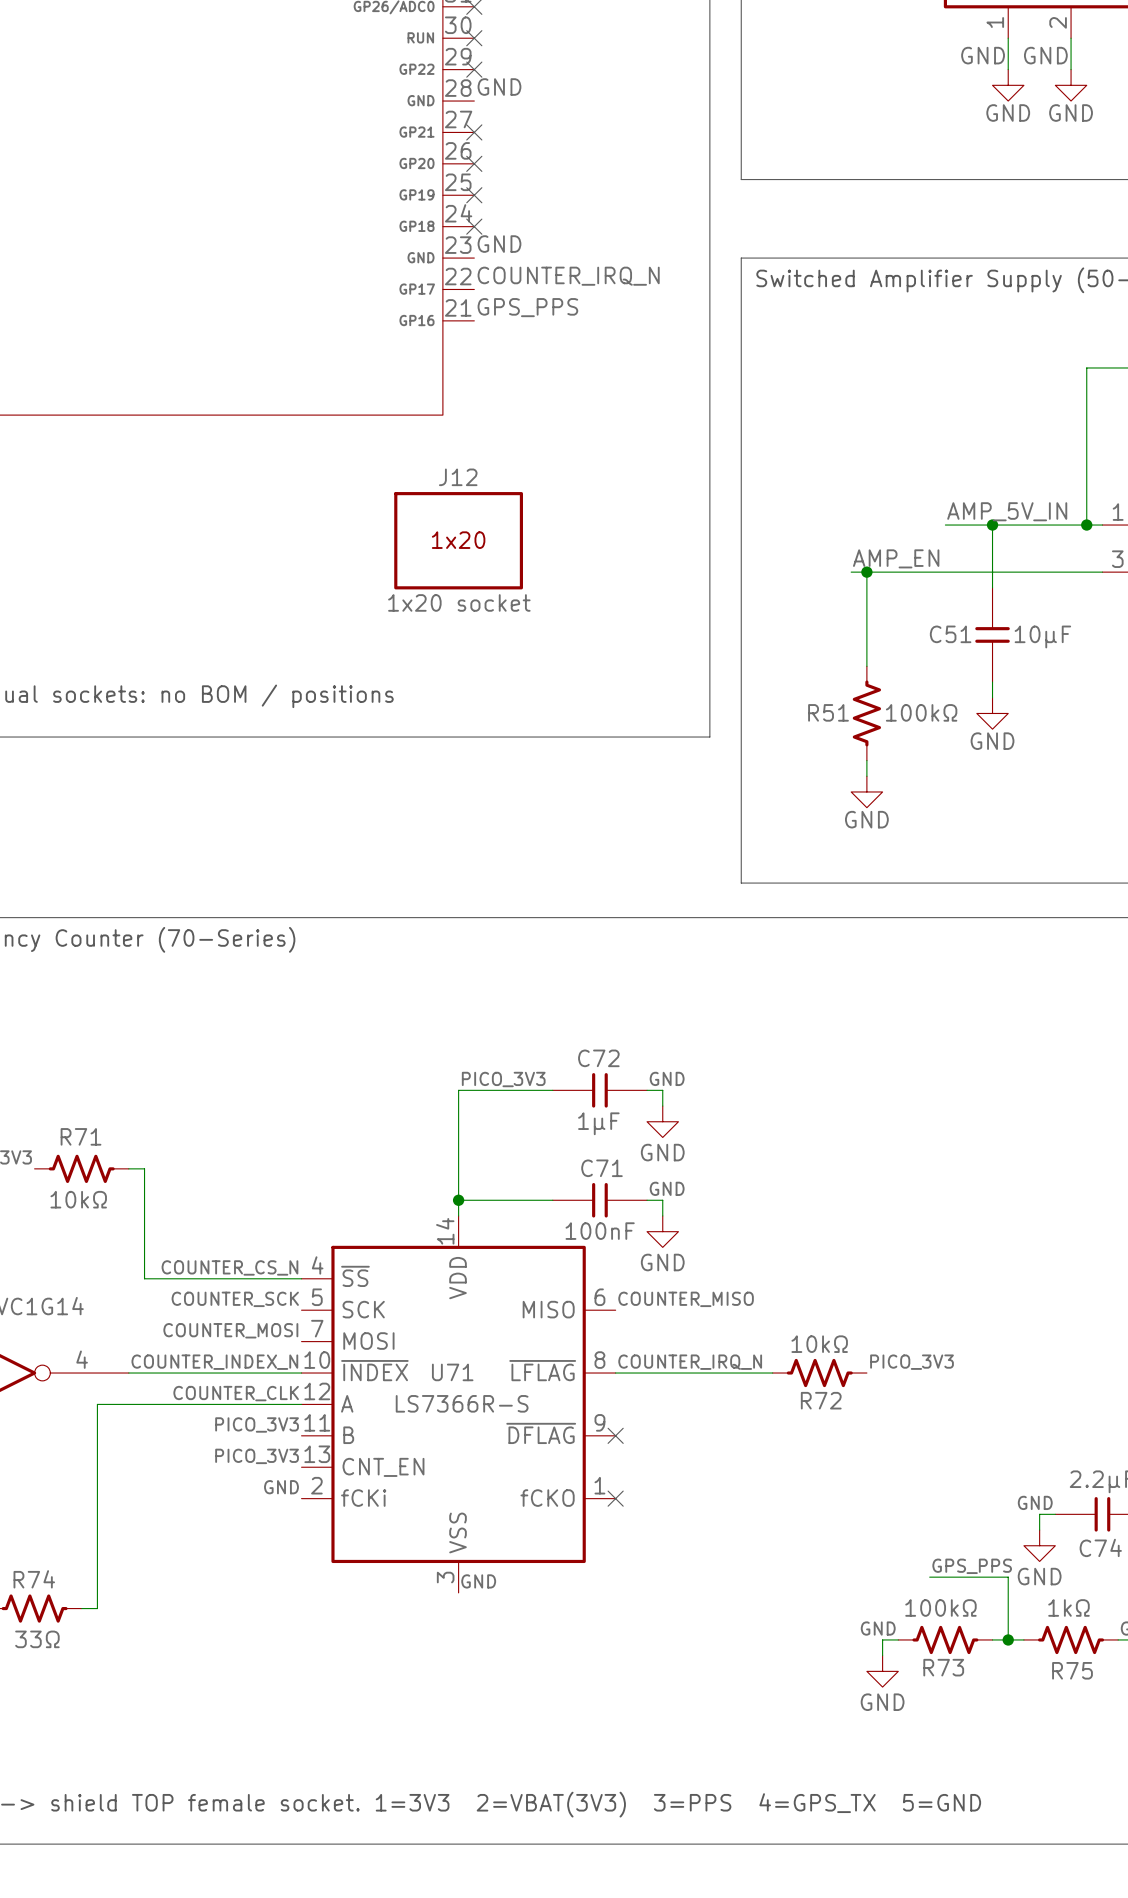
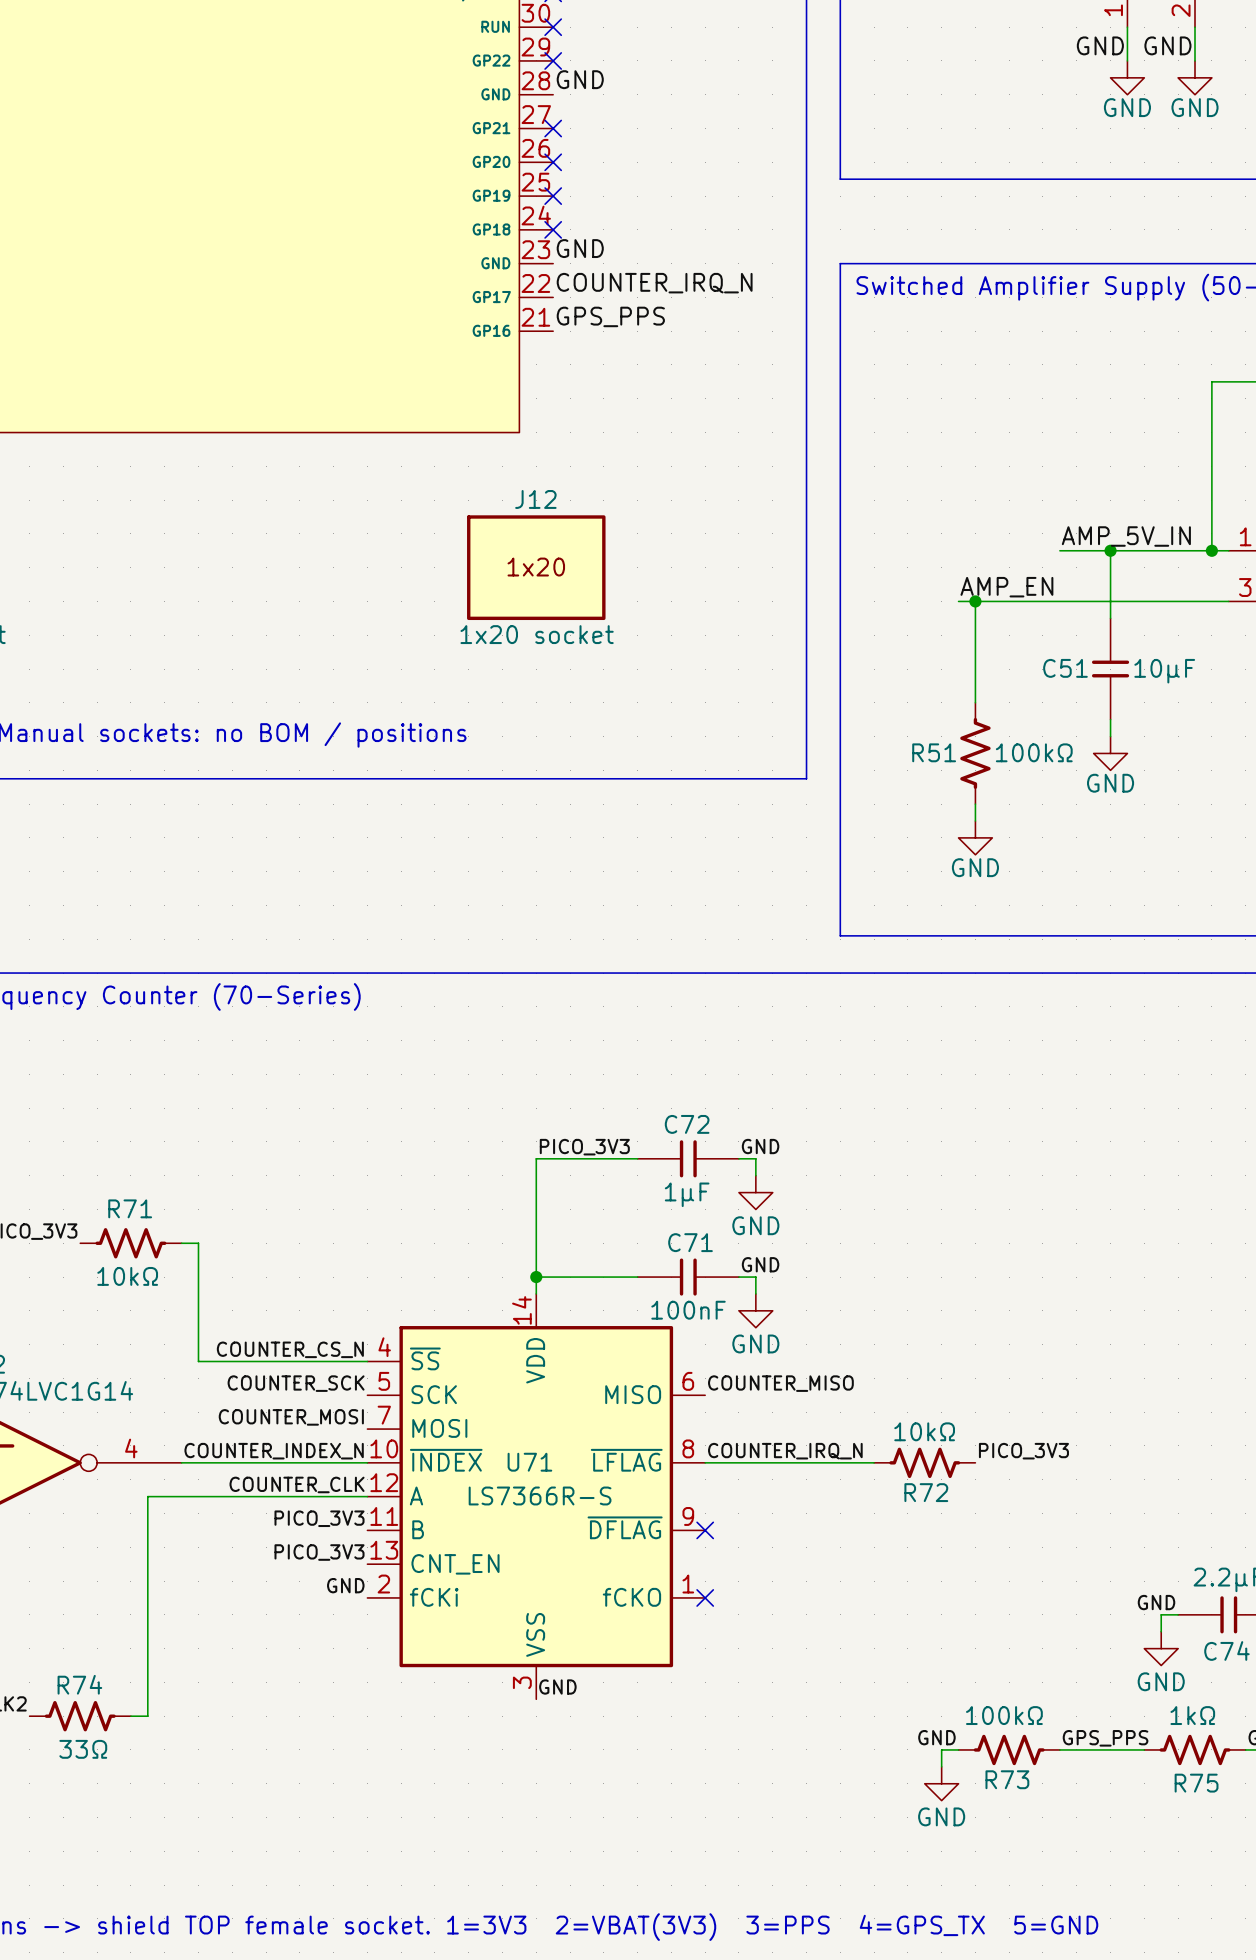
label position: GPS_PPS (972, 1566) -> GPS_PPS (1105, 1738)
wire: (929, 1577) (1008, 1577) (1008, 1639) -> none
label position: GND (878, 1628) -> GND (936, 1737)
wire: (898, 1639) (882, 1639) (882, 1655) -> (958, 1749) (941, 1749) (941, 1766)
R73 position: (945, 1639) -> (1009, 1749)
junction: (1008, 1639) -> none
power symbol position: GND (882, 1671) -> GND (941, 1783)

